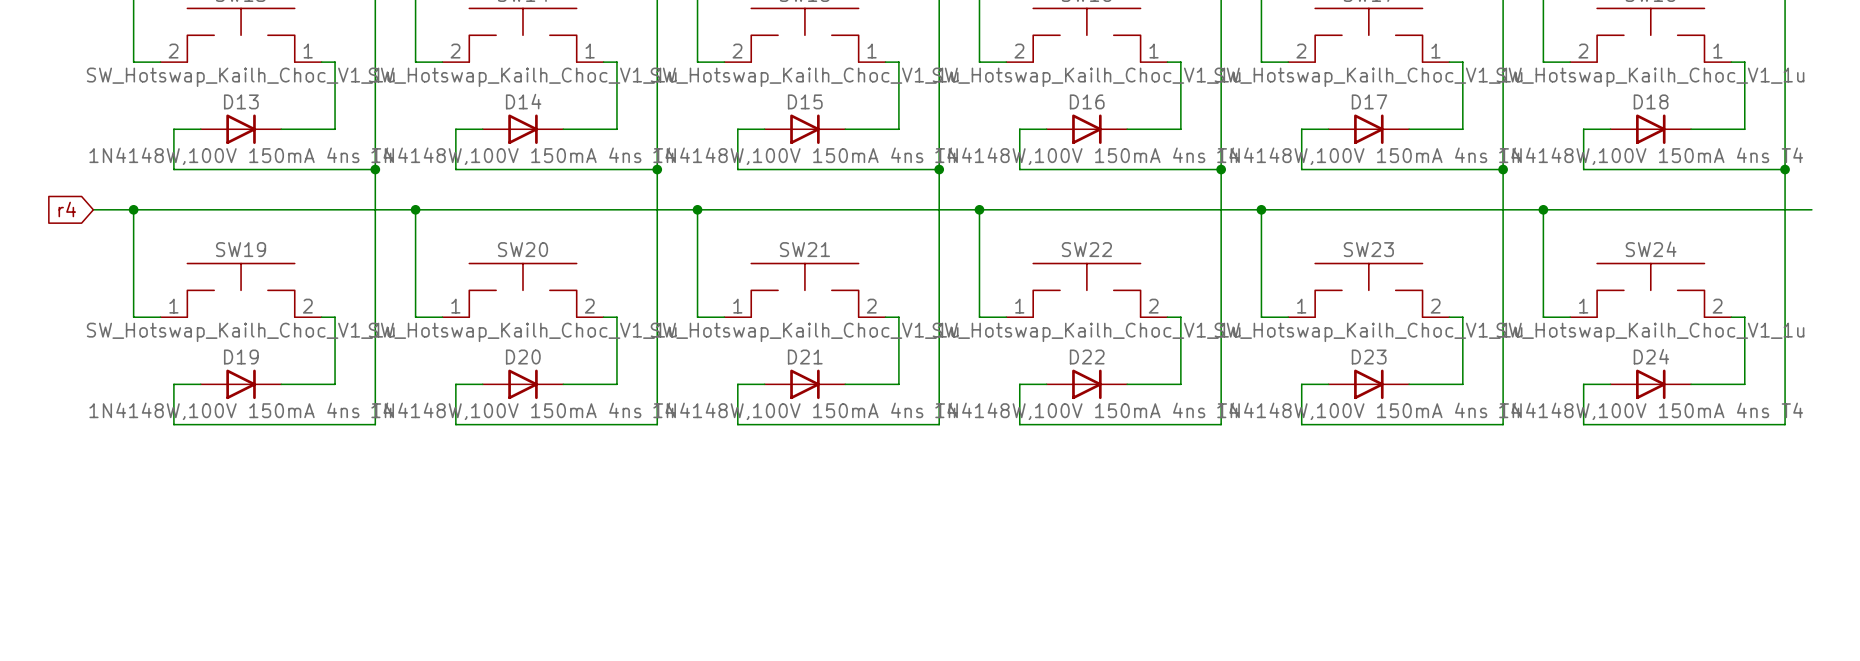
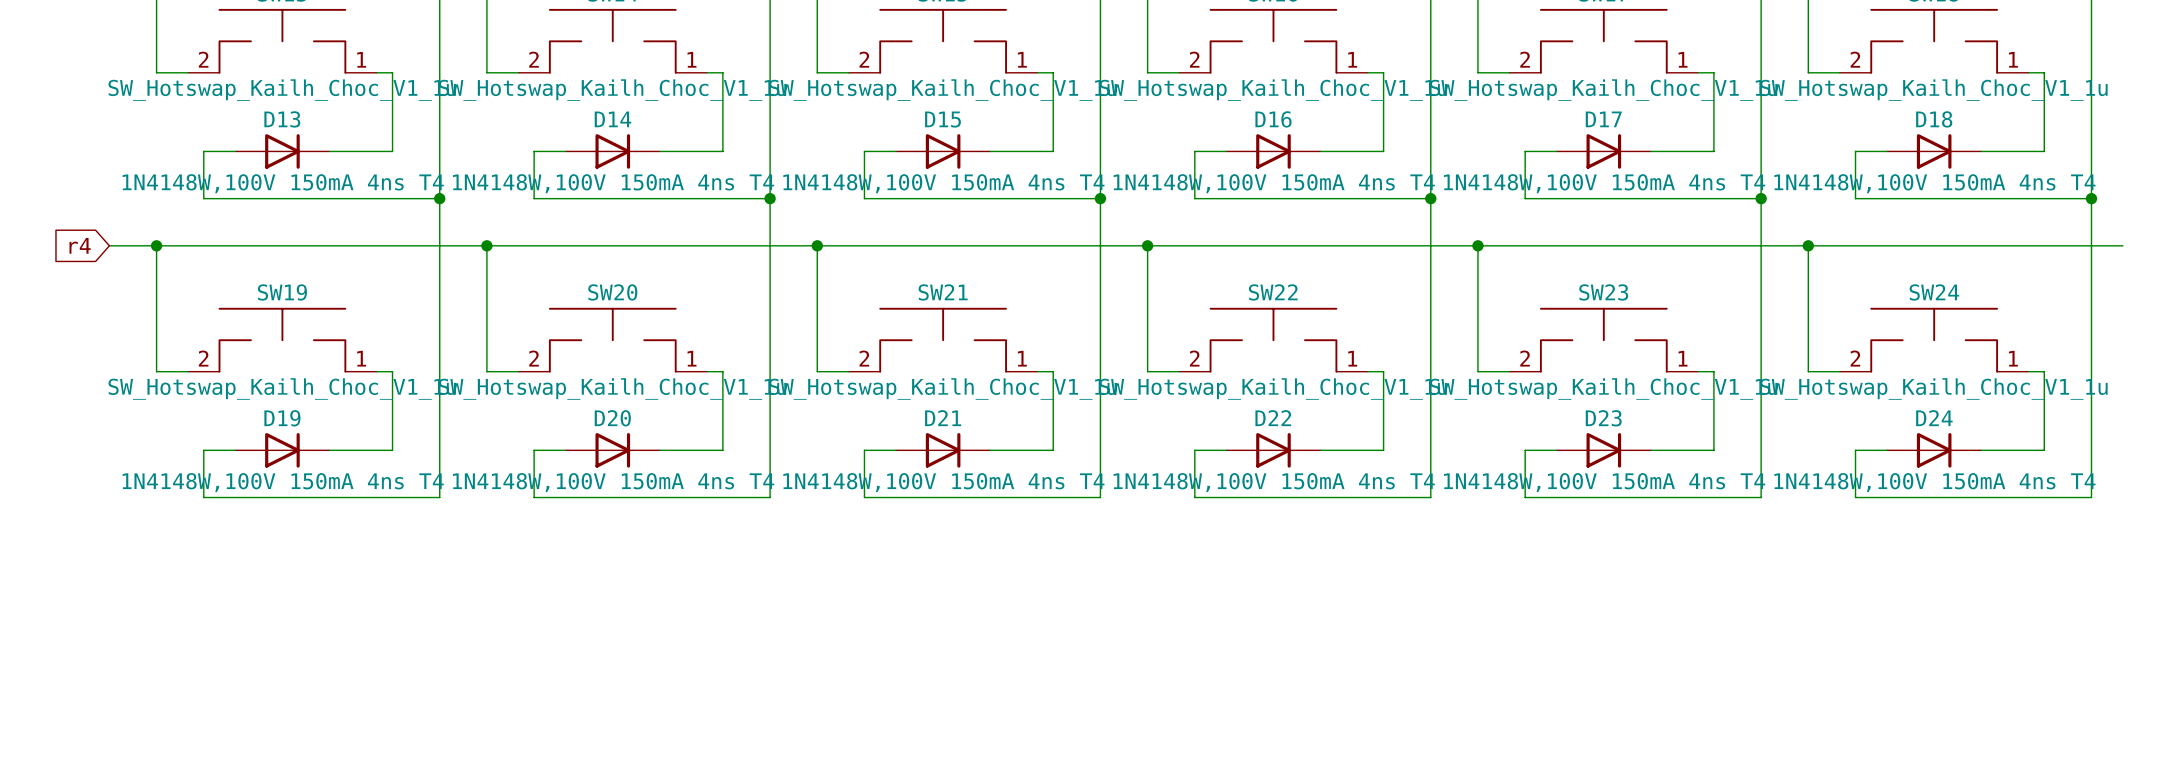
SW19 flip: as is (241, 290) -> left-right (282, 340)
SW20 flip: as is (522, 290) -> left-right (612, 340)
SW21 flip: as is (804, 290) -> left-right (943, 340)
SW22 flip: as is (1086, 290) -> left-right (1273, 340)
SW23 flip: as is (1368, 290) -> left-right (1603, 340)
SW24 flip: as is (1650, 290) -> left-right (1934, 340)

